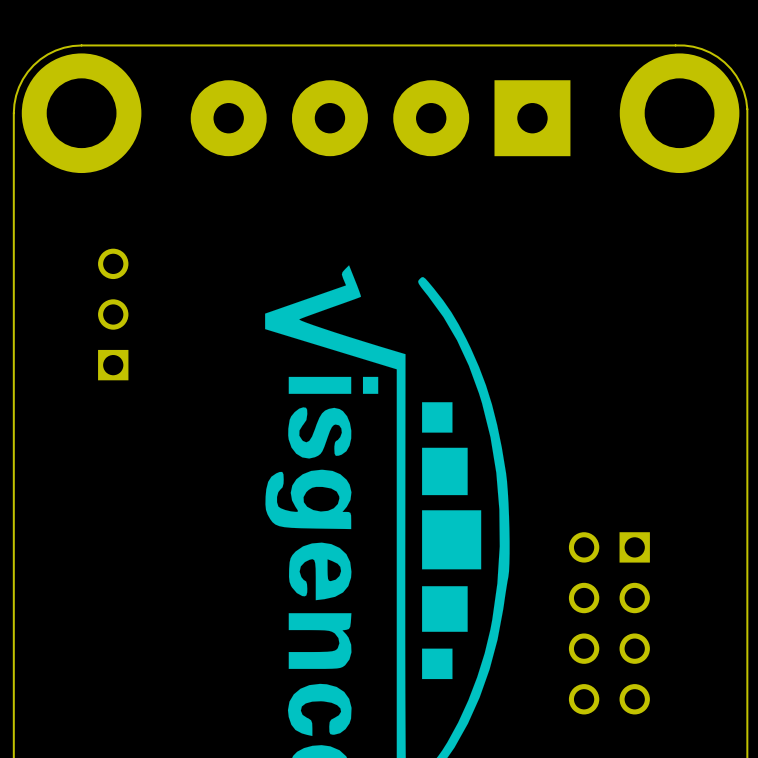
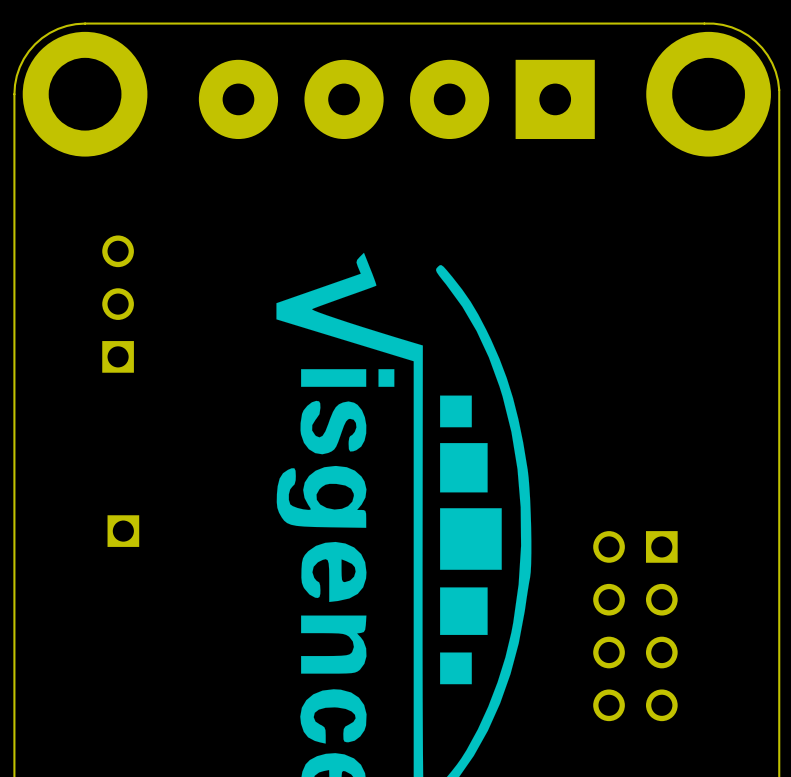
part: none -> (123, 531)

